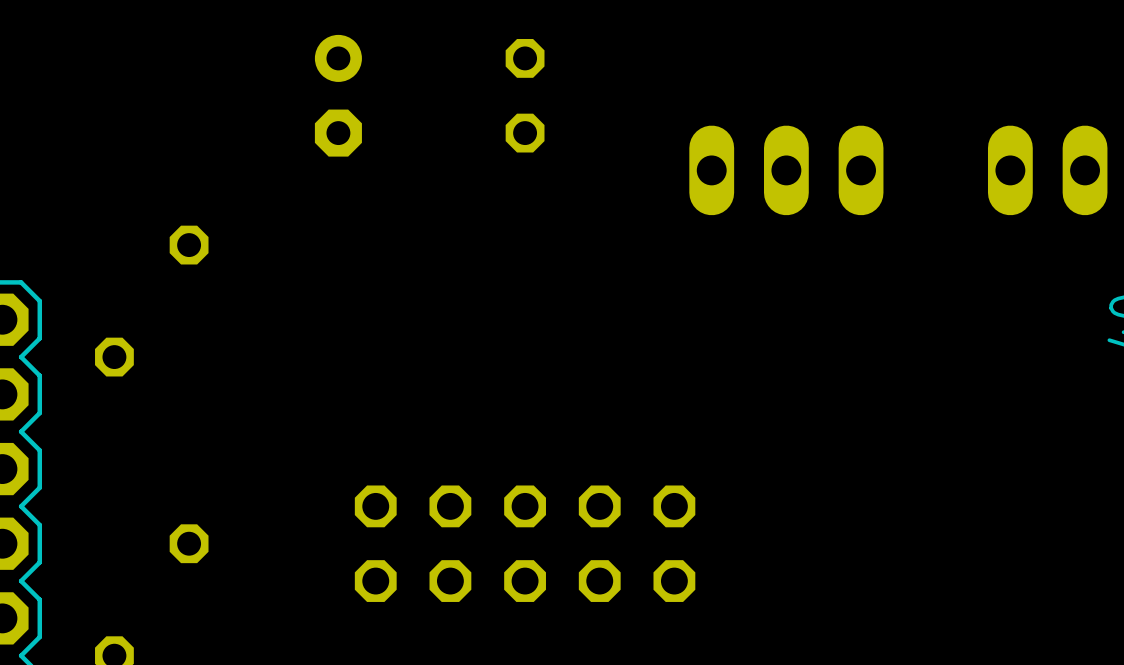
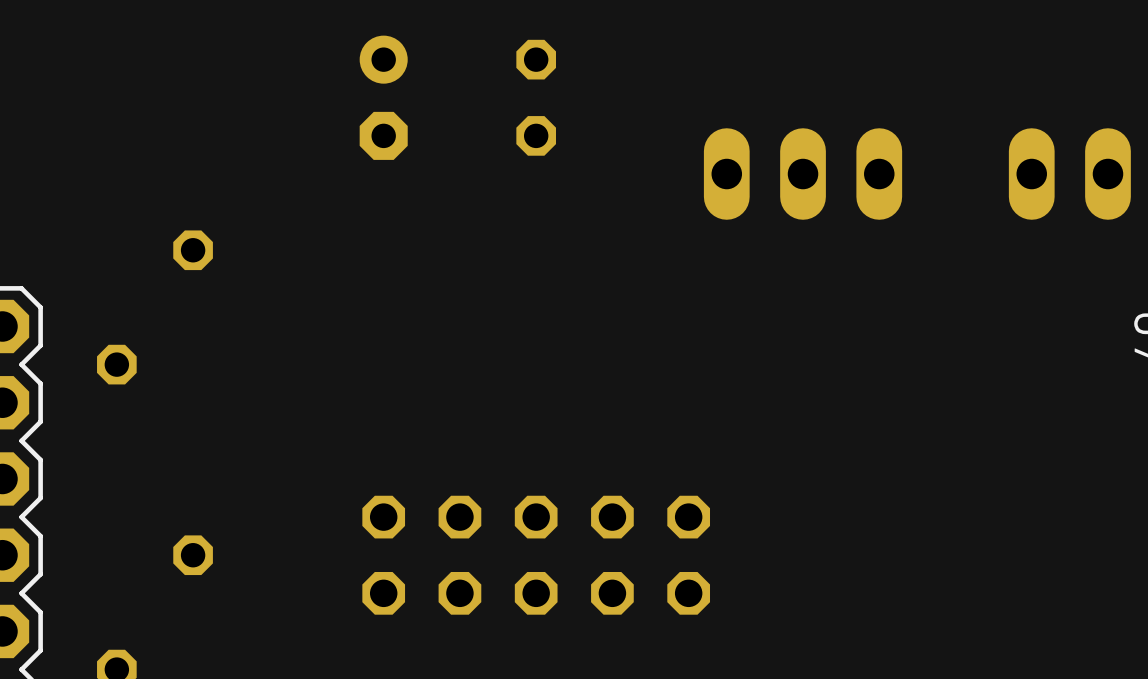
part position: (338, 95) -> (383, 97)

